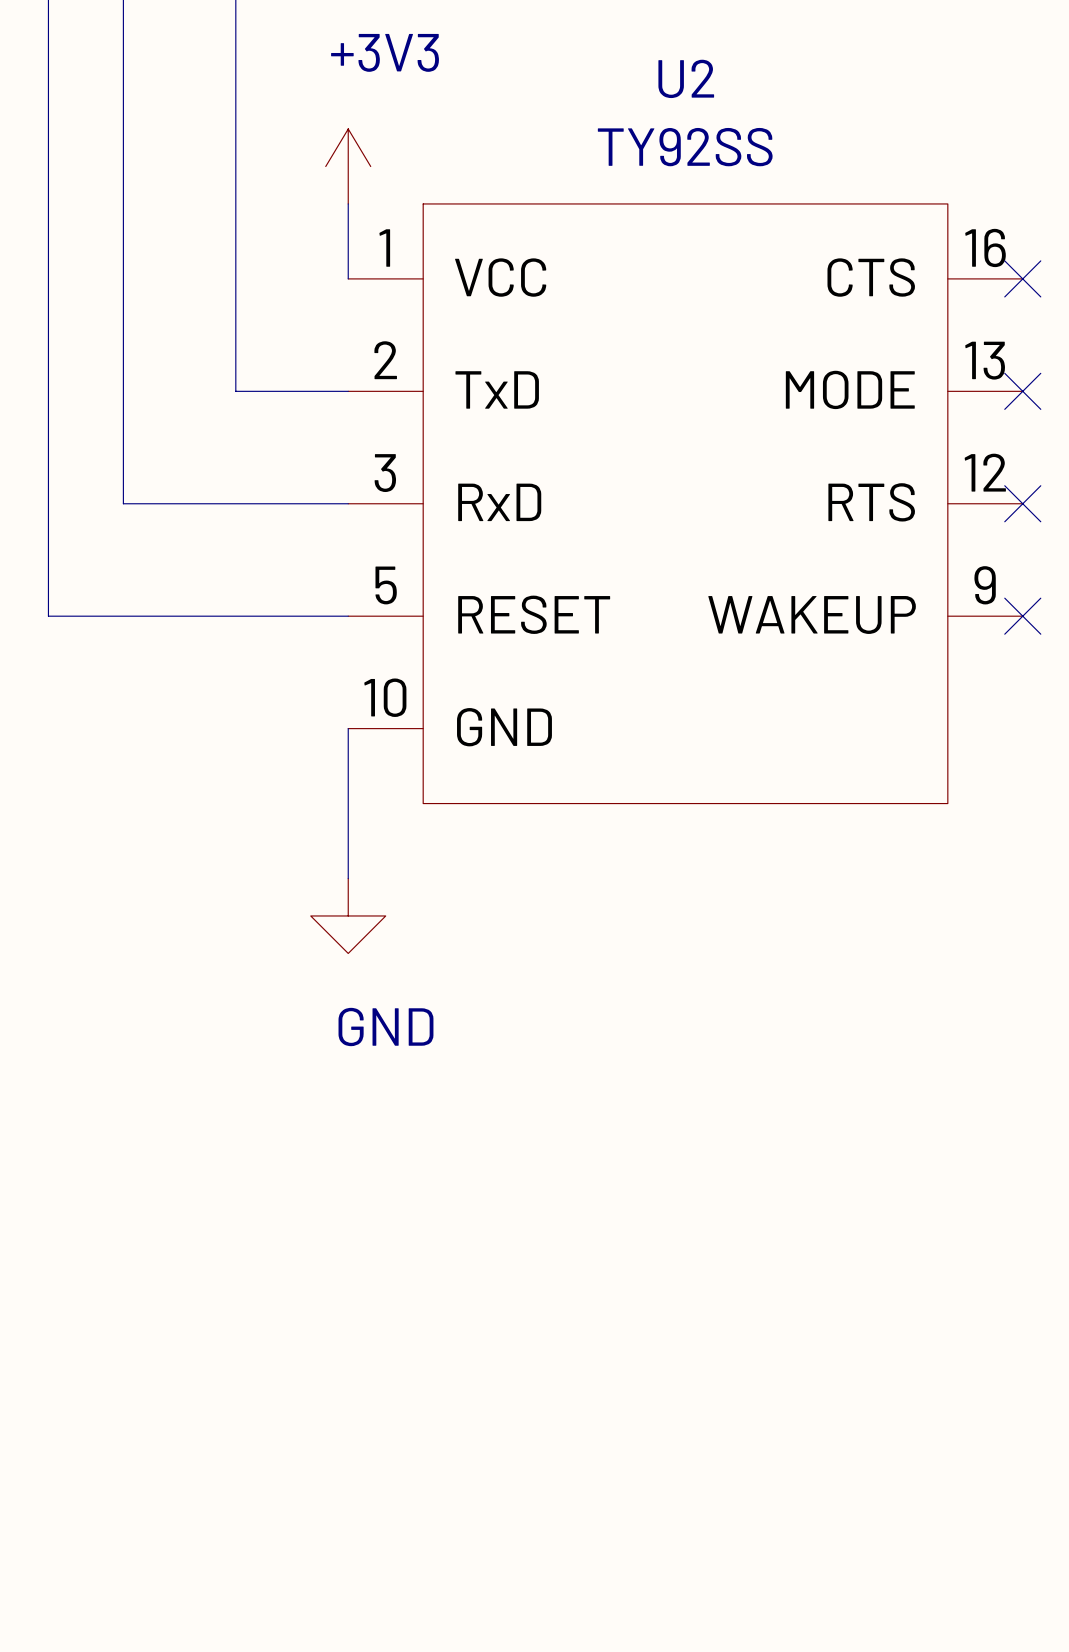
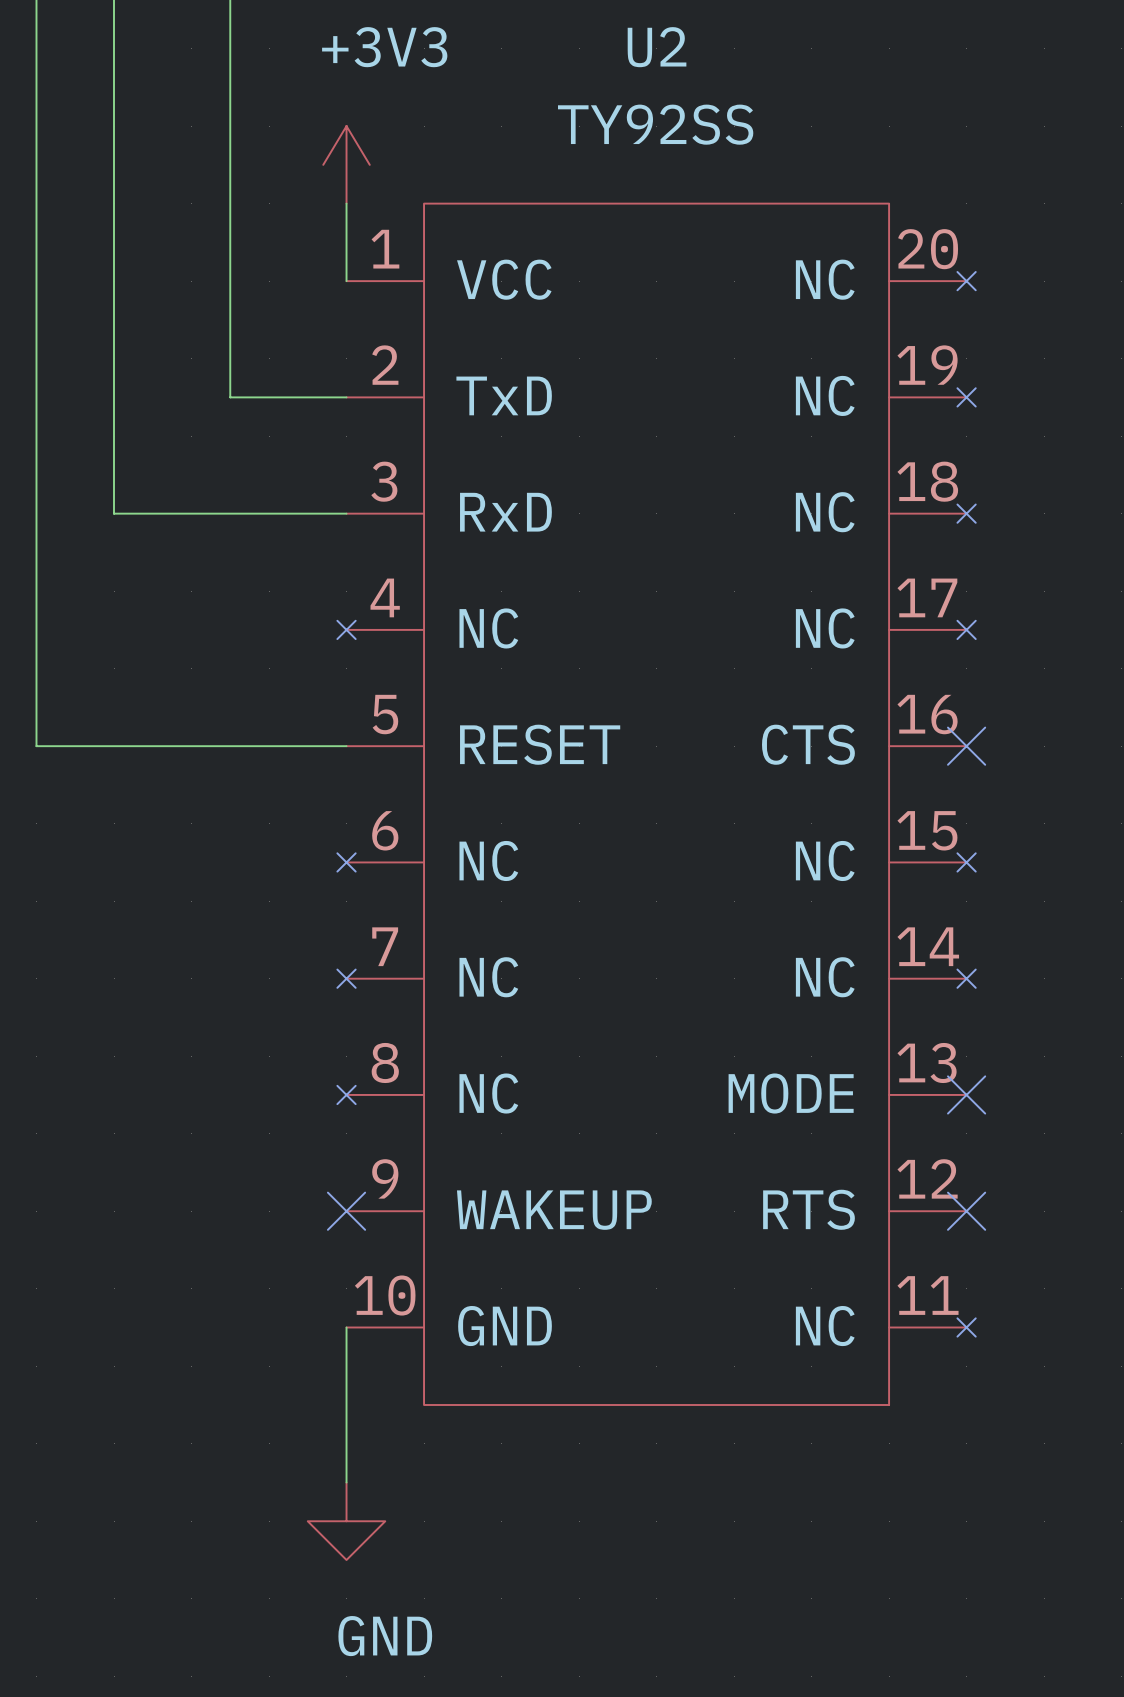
U2 name position: U2 (686, 78) -> U2 (657, 47)
U2 value position: TY92SS (685, 147) -> TY92SS (655, 124)
U2 symbol: [348, 203, 1023, 804] -> [337, 203, 976, 1405]
no-connect mark: (1022, 278) -> none
no-connect mark: (1022, 391) -> none
no-connect mark: (1022, 503) -> none
wire: (48, 616) (348, 616) -> (36, 629) (36, 746) (346, 746)
no-connect mark: (1022, 616) -> none
wire: (348, 728) (348, 878) -> (346, 1327) (346, 1482)
no-connect mark: none -> (966, 746)
power symbol position: GND (348, 915) -> GND (346, 1521)
no-connect mark: none -> (966, 1094)
no-connect mark: none -> (346, 1211)
no-connect mark: none -> (966, 1211)

